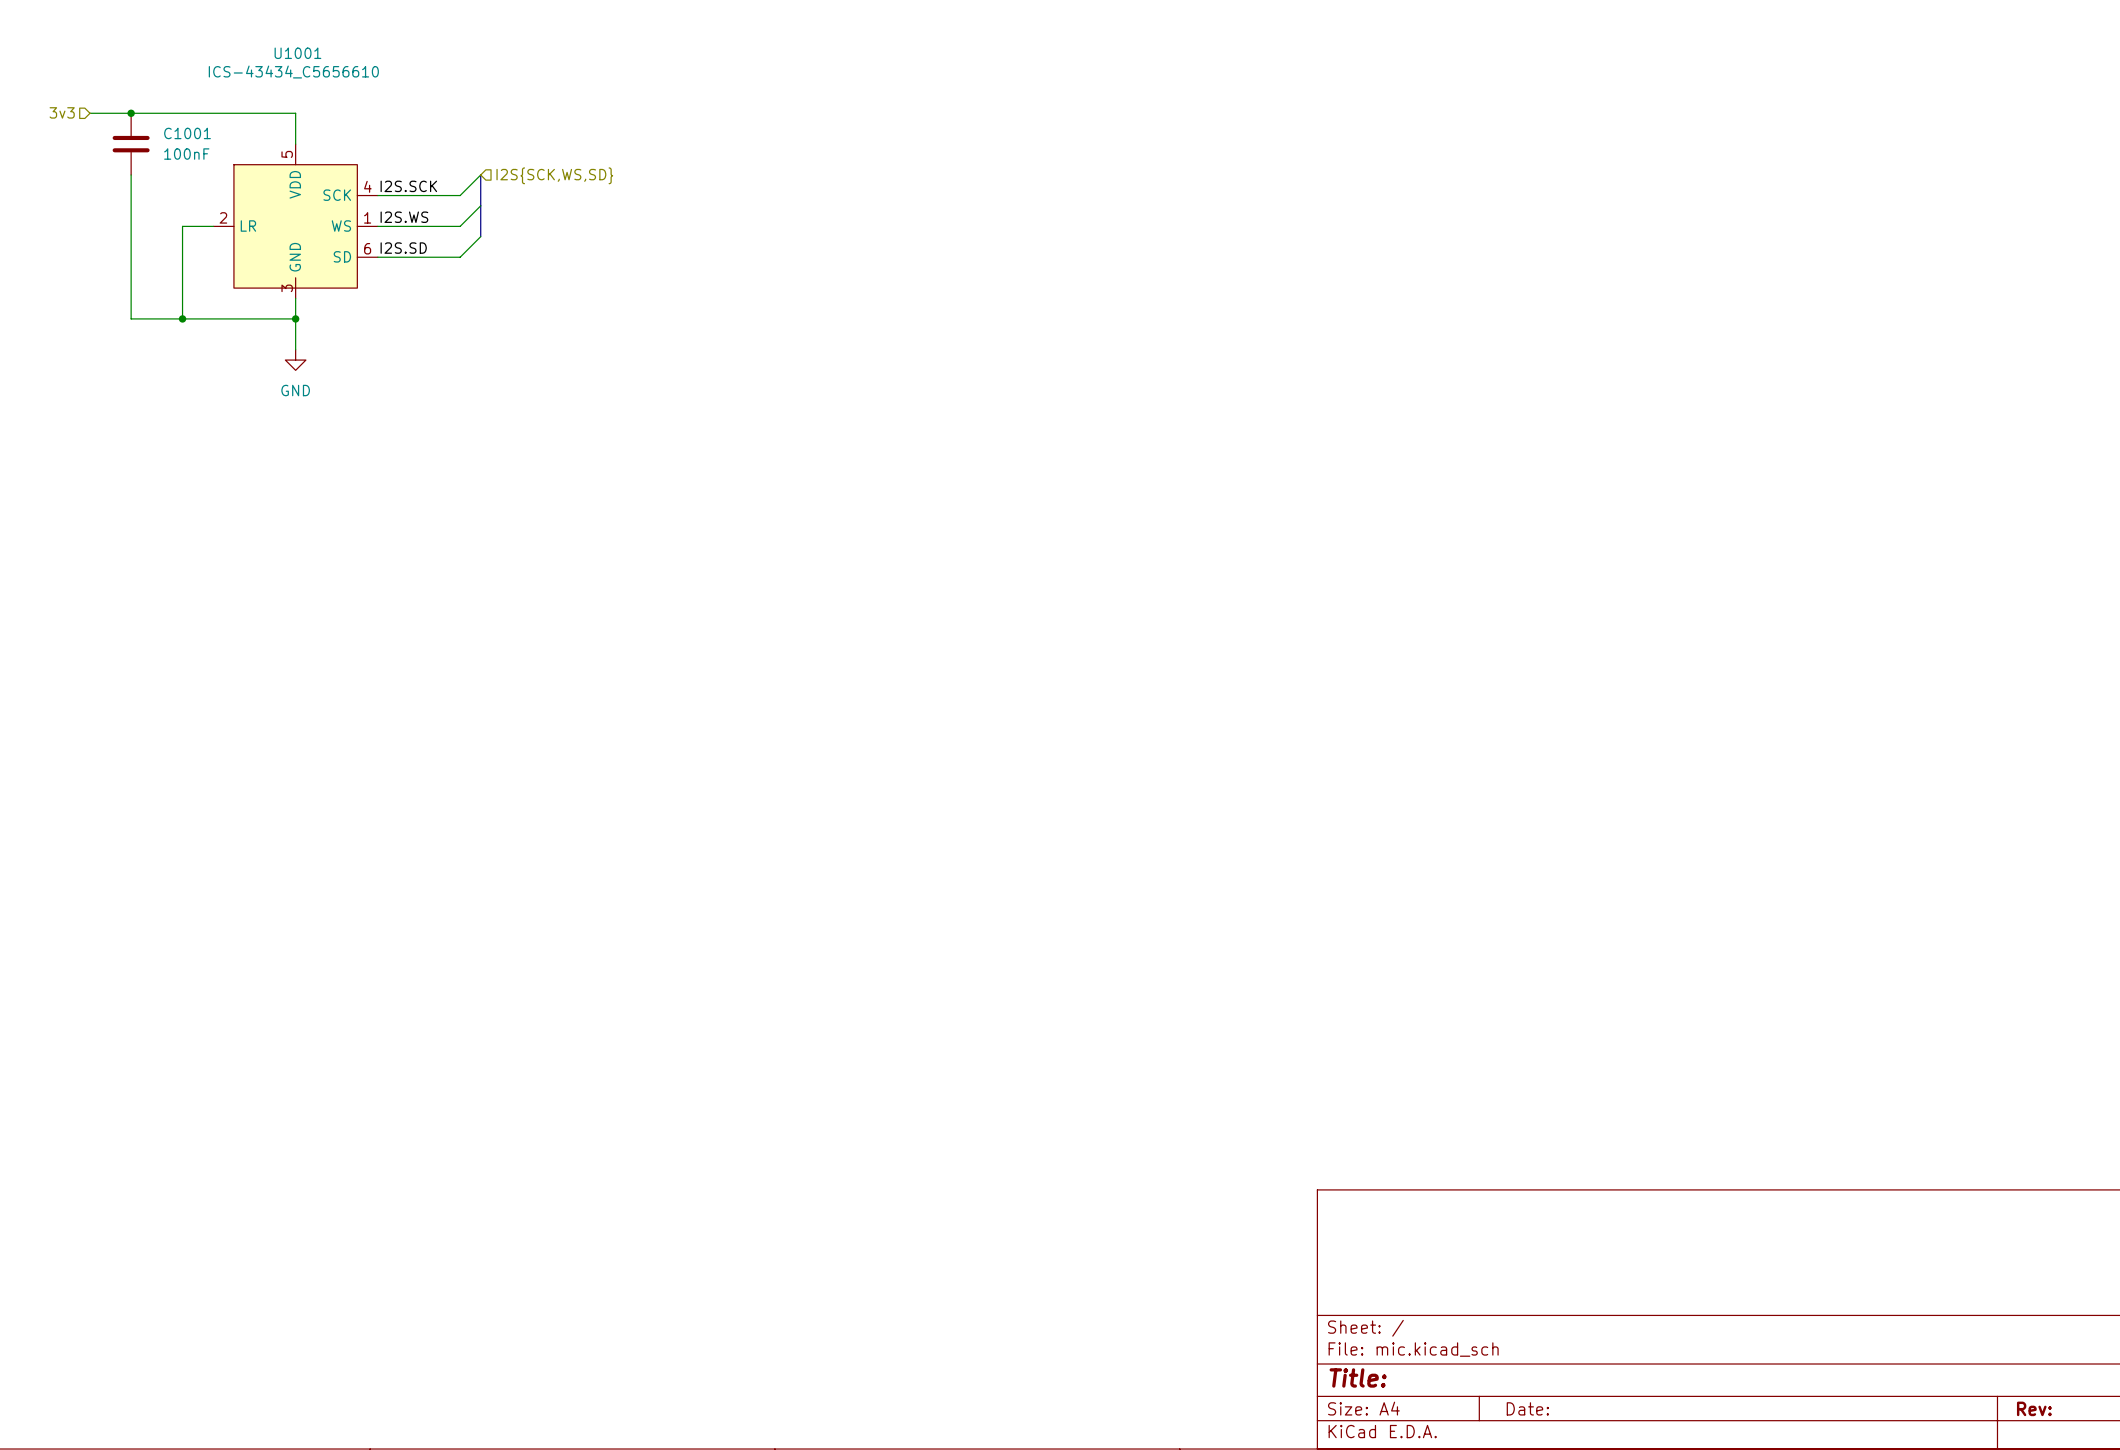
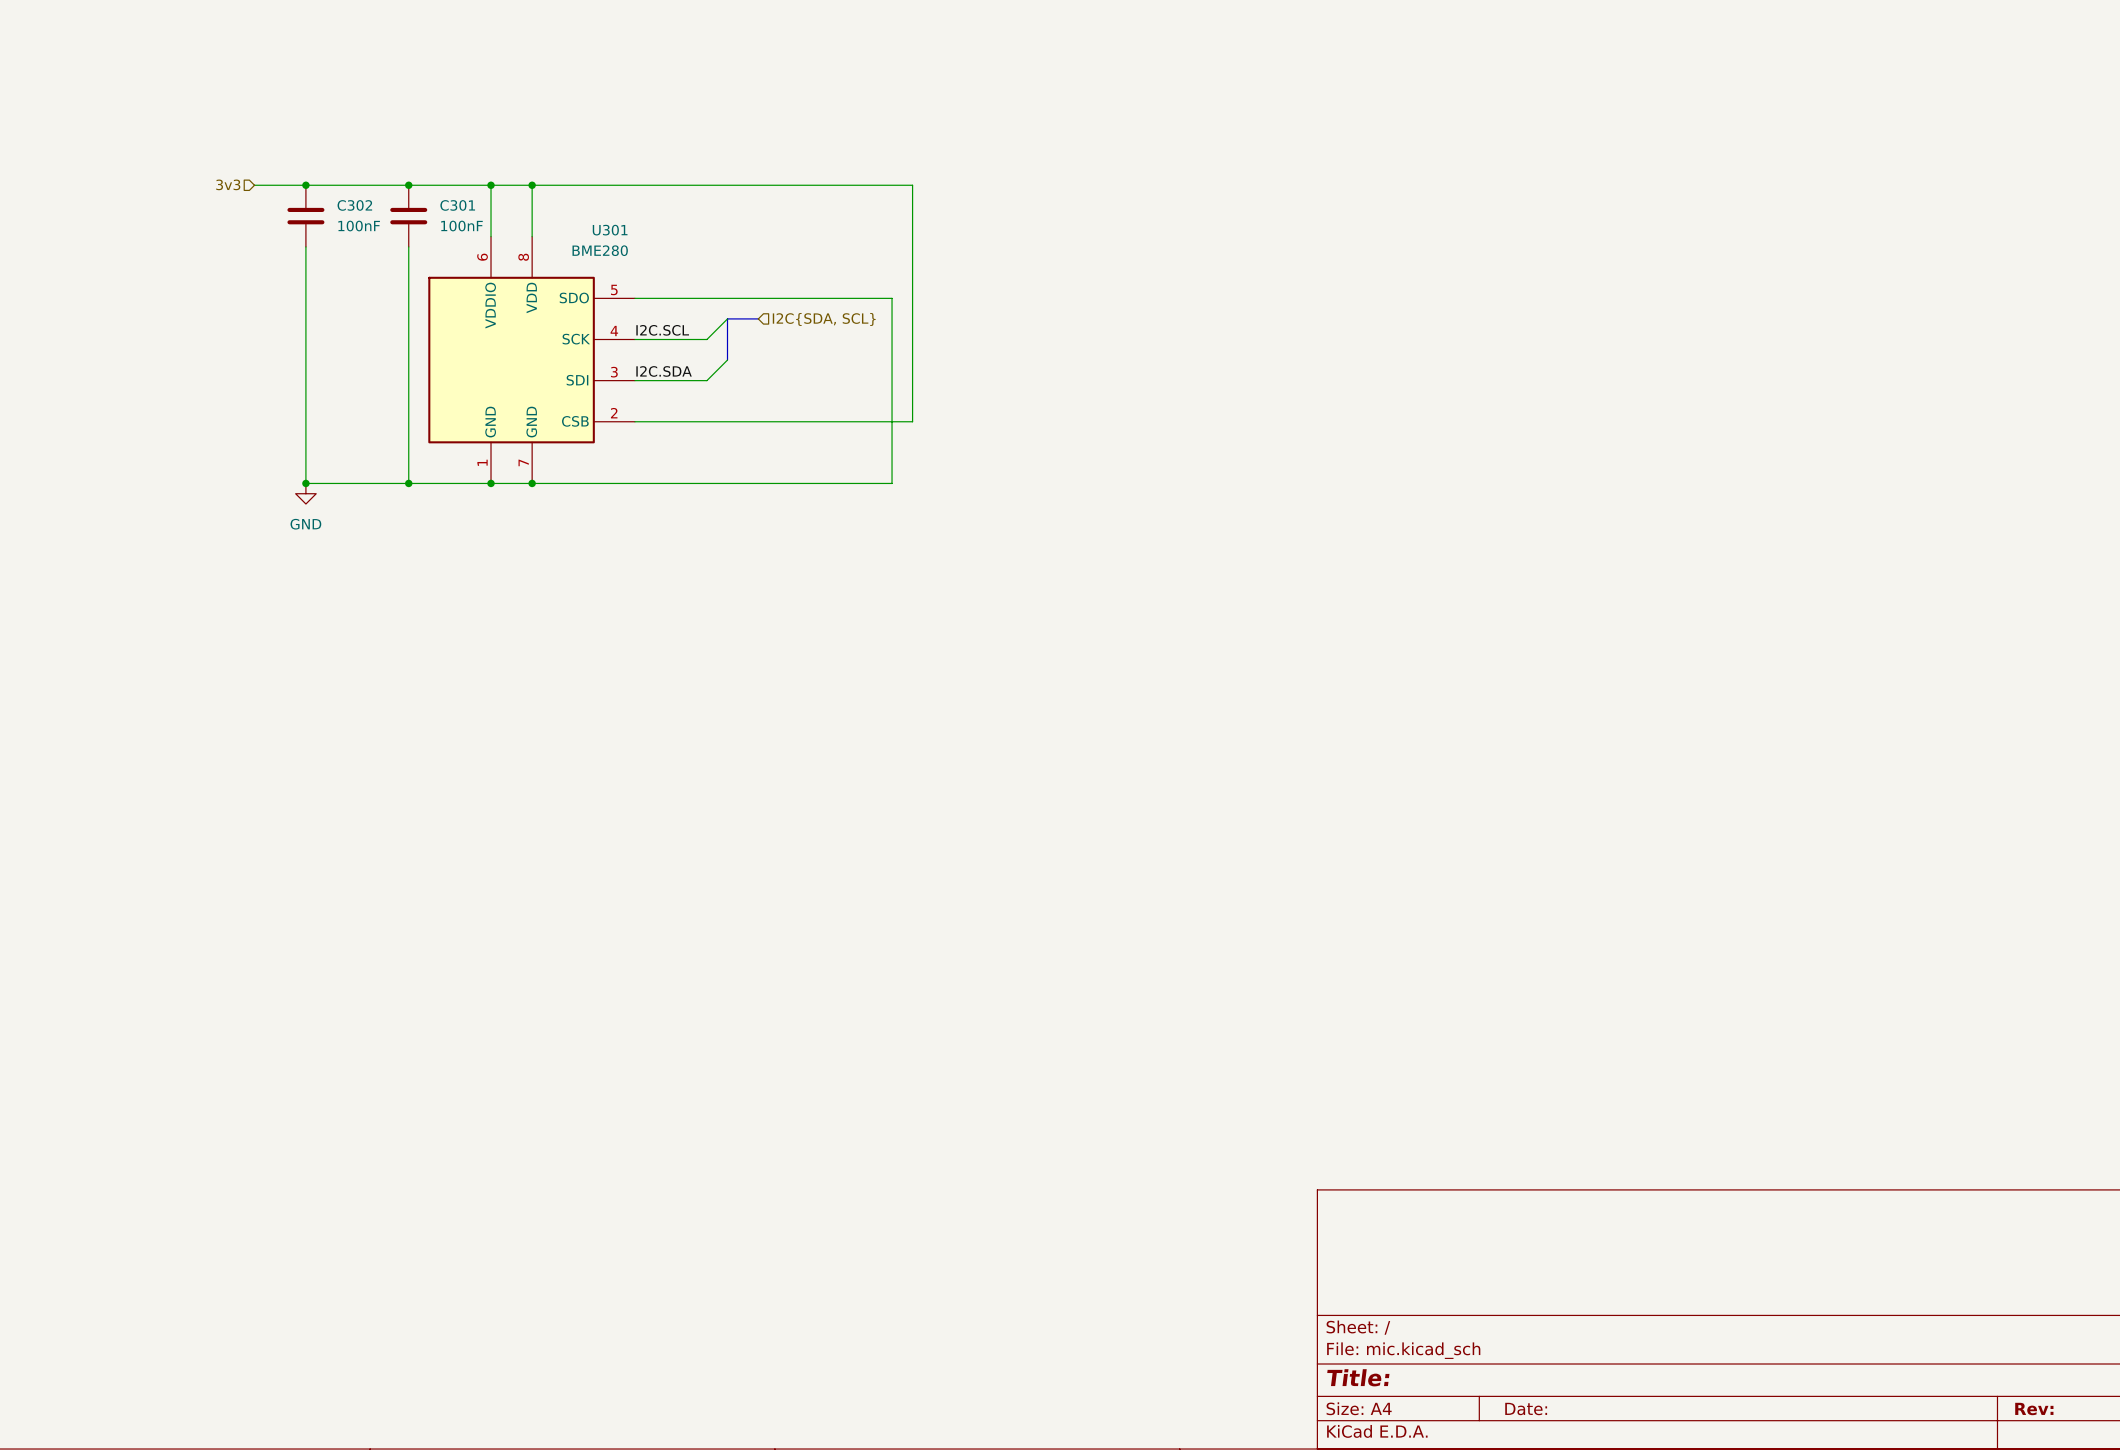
hierarchical label position: 3v3 (62, 112) -> 3v3 (228, 184)
wire: (90, 113) (295, 113) (295, 144) -> none
junction: (131, 113) -> none
C1001: 100nF (131, 144) -> none
wire: (131, 174) (131, 318) (295, 318) -> none
wire: (480, 174) (460, 195) (377, 195) -> none
bus: (480, 174) (480, 236) -> none
hierarchical label: I2S{SCK,WS,SD} (554, 175) -> none
wire: none -> (254, 185) (912, 185) (912, 421) (634, 421)
junction: none -> (305, 185)
junction: none -> (408, 185)
wire: none -> (491, 185) (491, 236)
junction: none -> (491, 185)
wire: none -> (532, 185) (532, 236)
junction: none -> (532, 185)
label: I2S.SCK (408, 186) -> none
wire: (480, 205) (460, 226) (377, 226) -> none
C302: none -> 100nF (305, 216)
C301: none -> 100nF (408, 216)
label: I2S.WS (404, 217) -> none
U1001: ICS-43434_C5656610 (295, 221) -> none
wire: (213, 226) (182, 226) (182, 318) -> none
wire: (480, 236) (460, 257) (377, 257) -> none
wire: none -> (305, 246) (305, 483) (892, 483) (892, 298) (634, 298)
wire: none -> (408, 246) (408, 483)
label: I2S.SD (403, 248) -> none
wire: (295, 298) (295, 349) -> none
junction: (182, 318) -> none
junction: (295, 318) -> none
wire: none -> (727, 318) (706, 339) (634, 339)
bus: none -> (758, 318) (727, 318) (727, 360)
hierarchical label: none -> I2C{SDA, SCL} (824, 319)
label: none -> I2C.SCL (662, 330)
power symbol position: GND (295, 360) -> GND (305, 493)
U301: none -> BME280 (531, 360)
wire: none -> (727, 360) (706, 380) (634, 380)
label: none -> I2C.SDA (664, 371)
junction: none -> (305, 483)
junction: none -> (408, 483)
junction: none -> (491, 483)
junction: none -> (532, 483)

